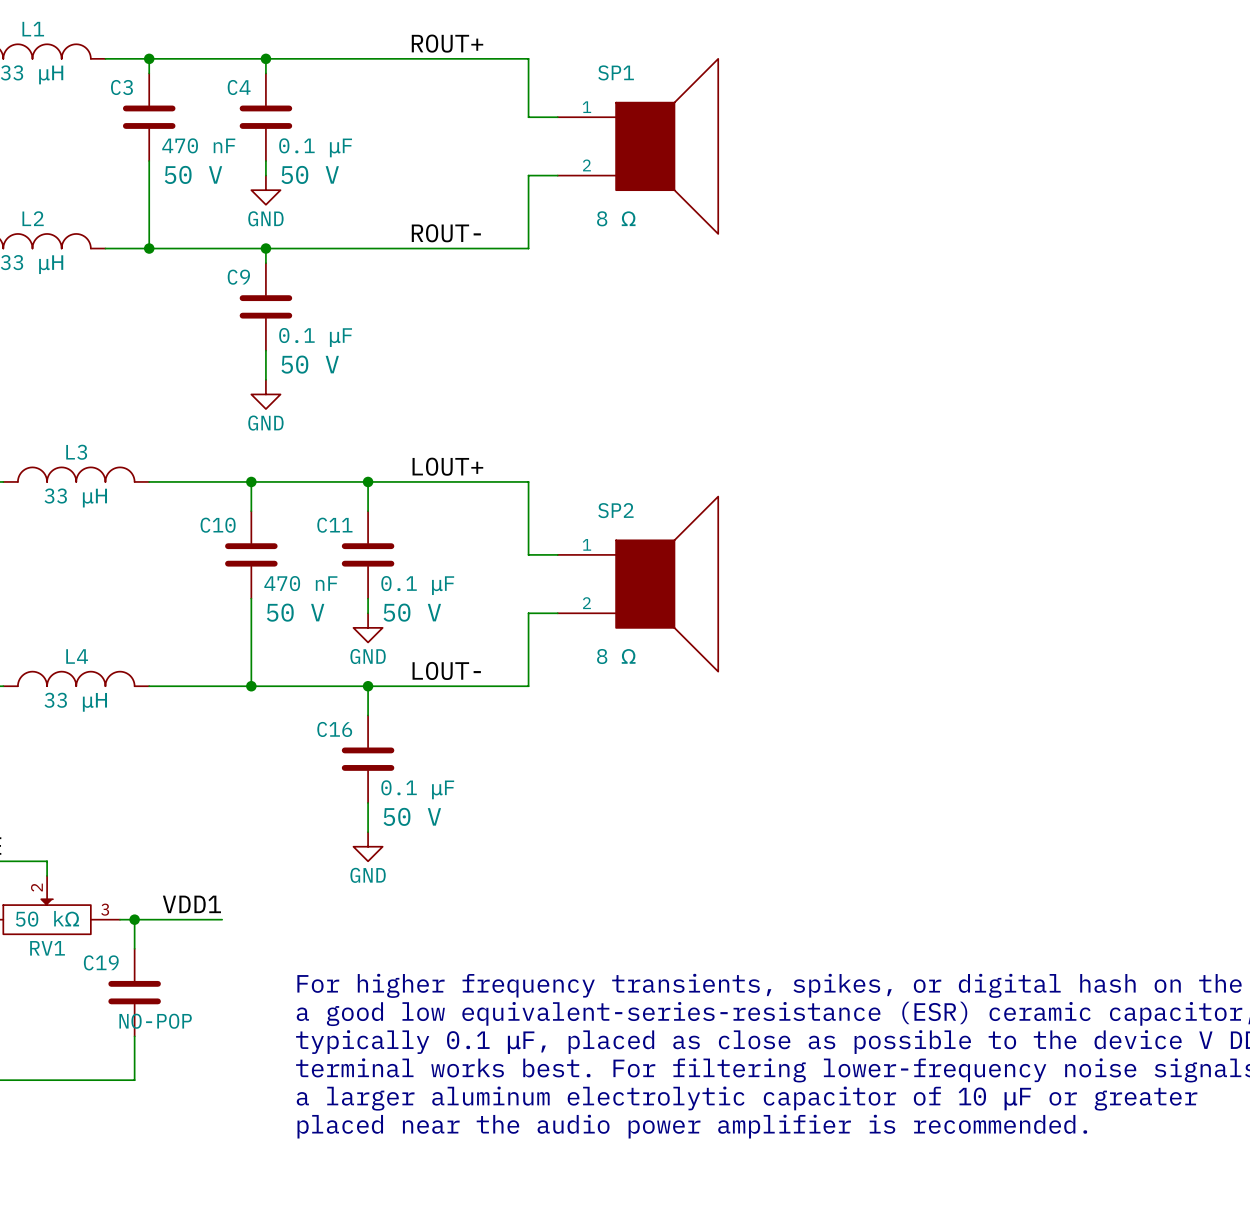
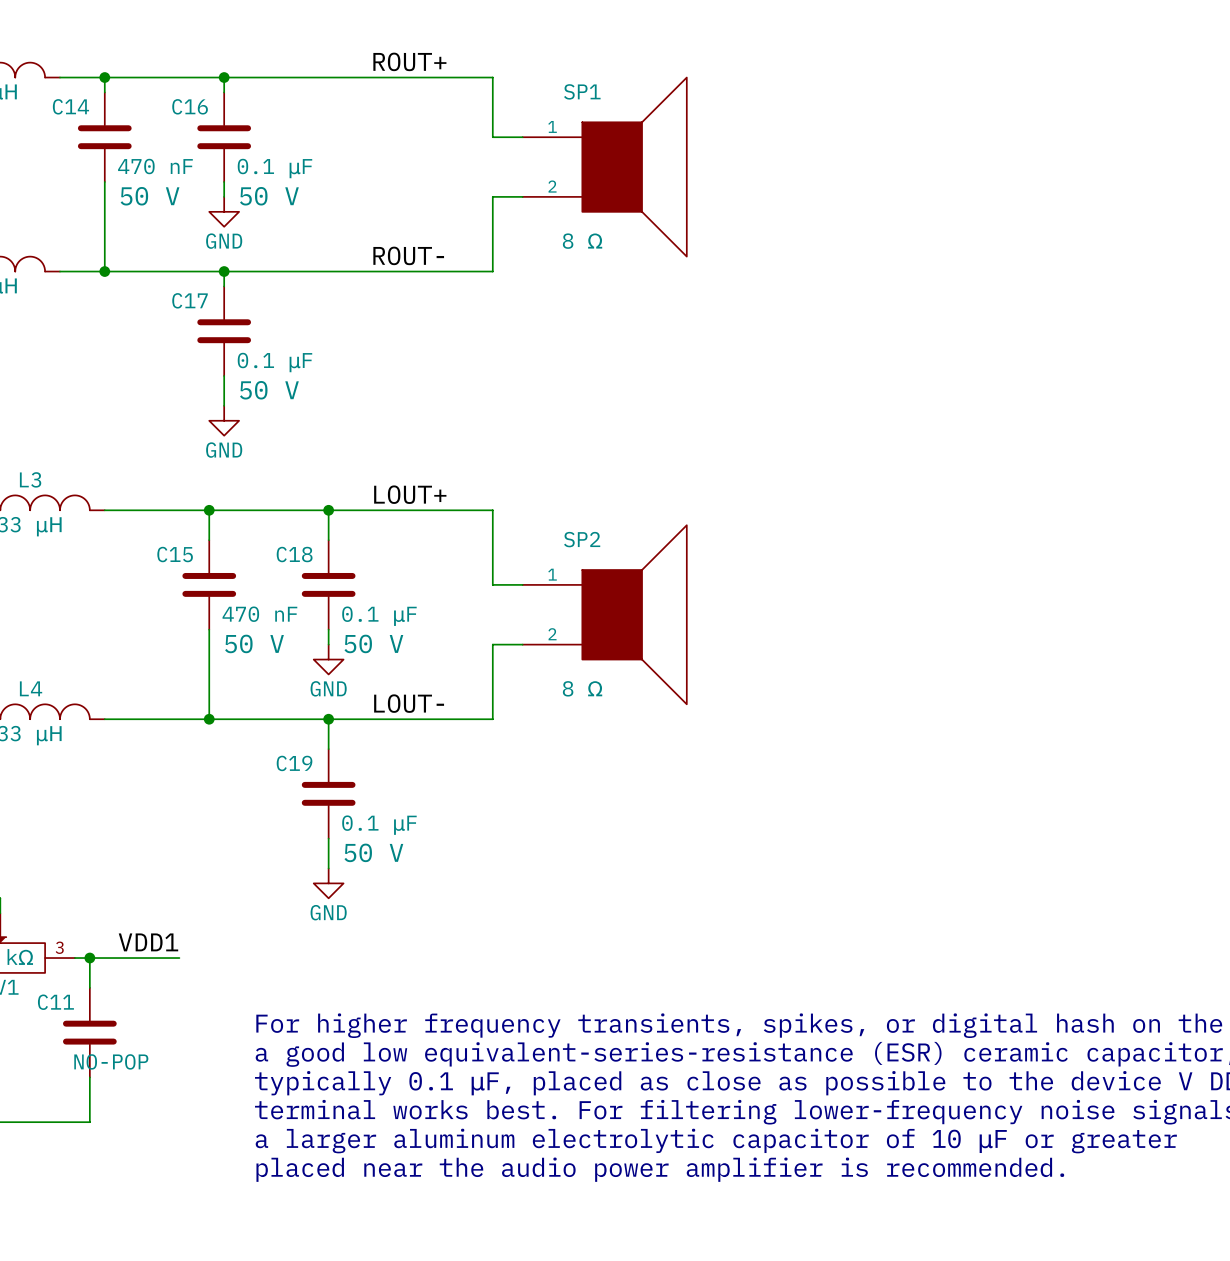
C3 name: C3 (121, 87) -> C14 (70, 106)
C4 name: C4 (239, 87) -> C16 (190, 106)
C9 name: C9 (238, 277) -> C17 (190, 300)
C10 name: C10 (218, 525) -> C15 (175, 554)
C11 name: C11 (334, 525) -> C18 (294, 554)
C16 name: C16 (334, 729) -> C19 (294, 763)
C19 name: C19 (101, 962) -> C11 (55, 1002)

